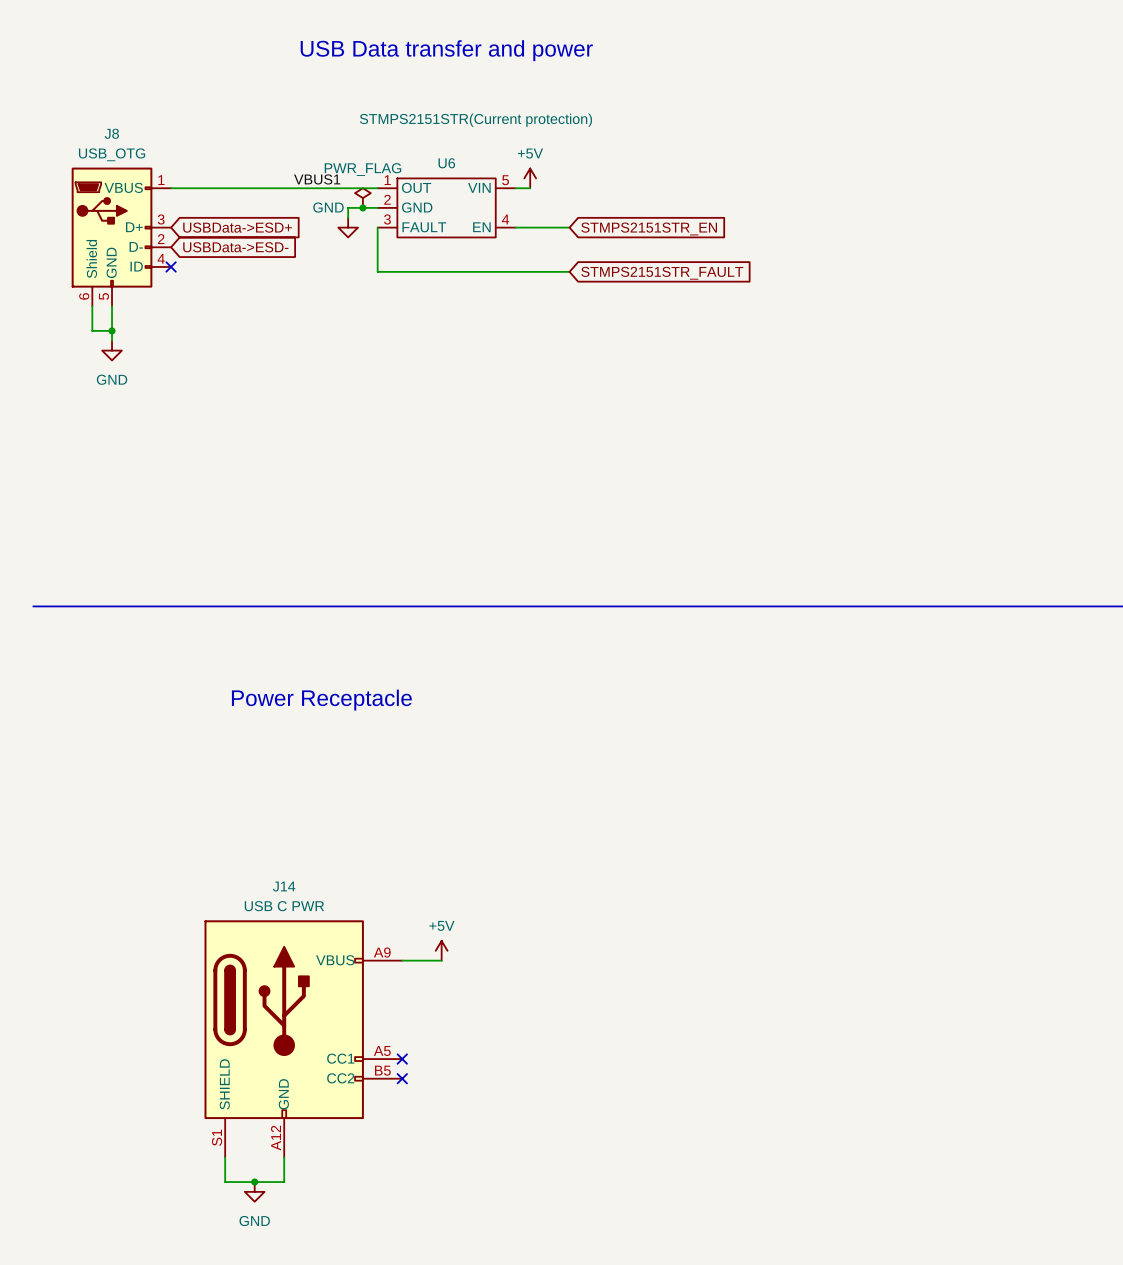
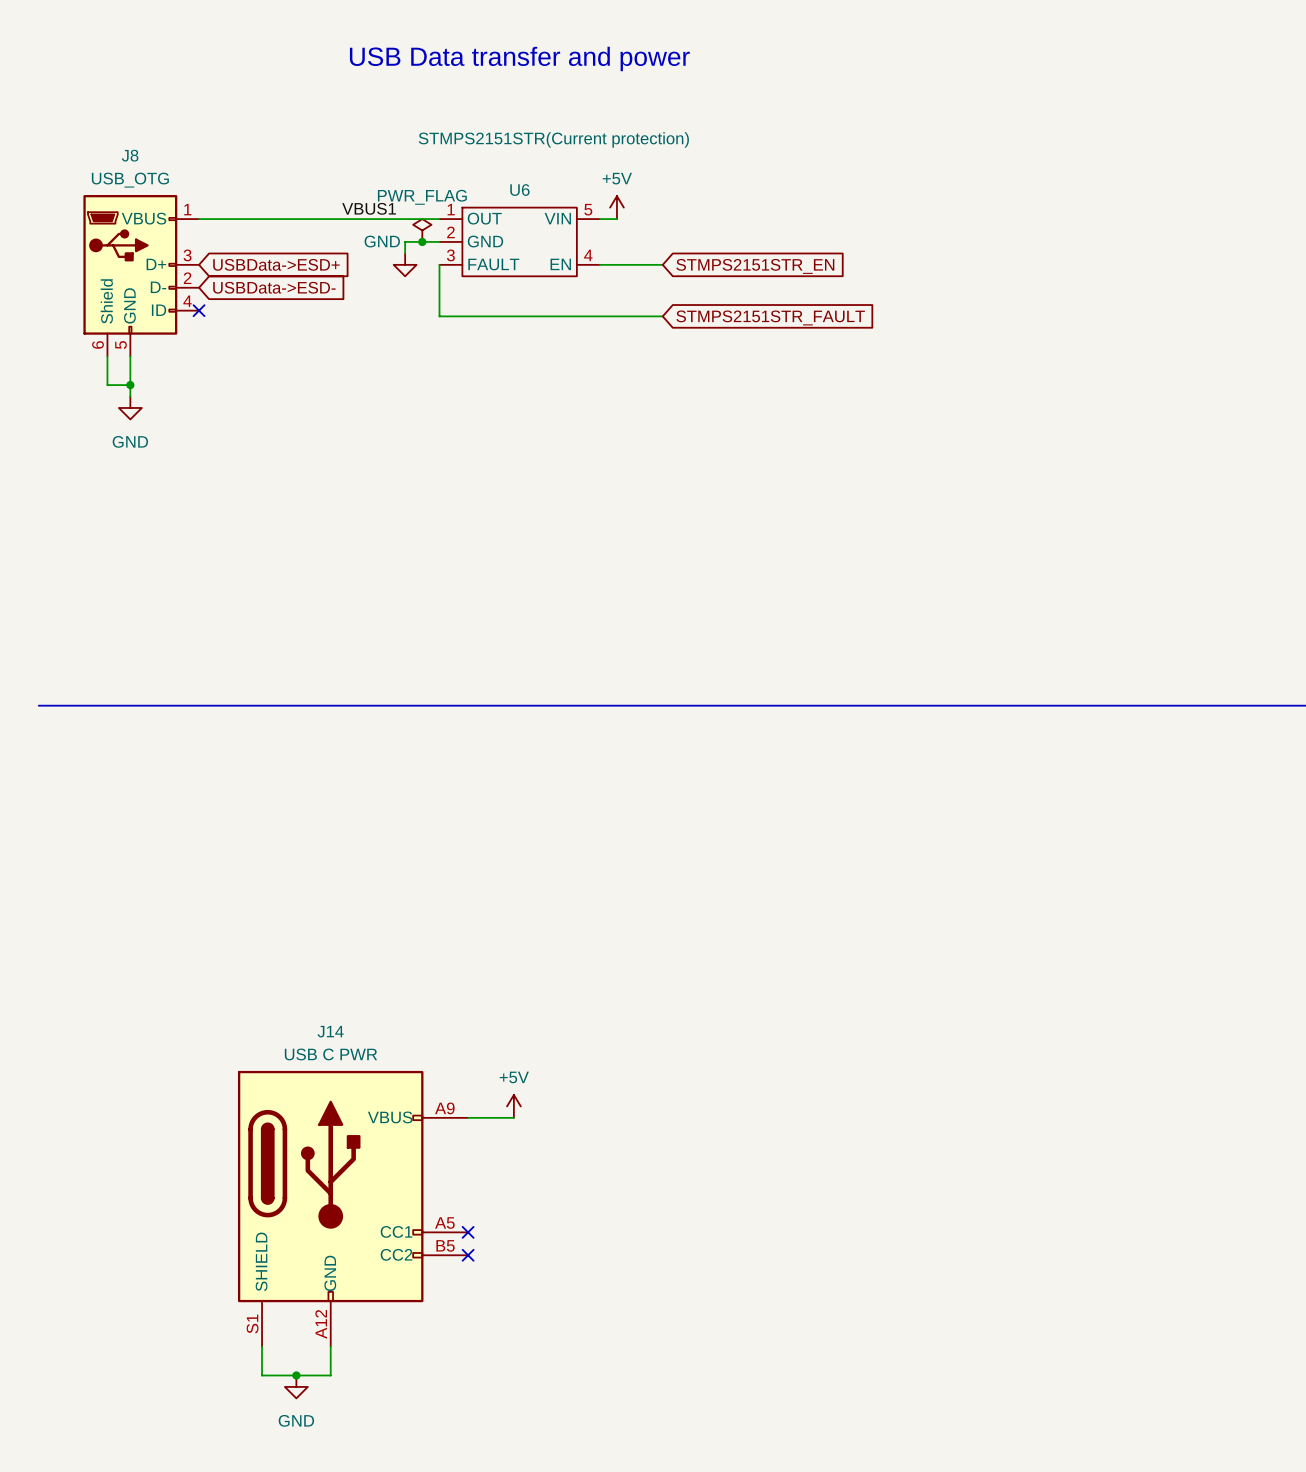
text: Power Receptacle (321, 700) -> none

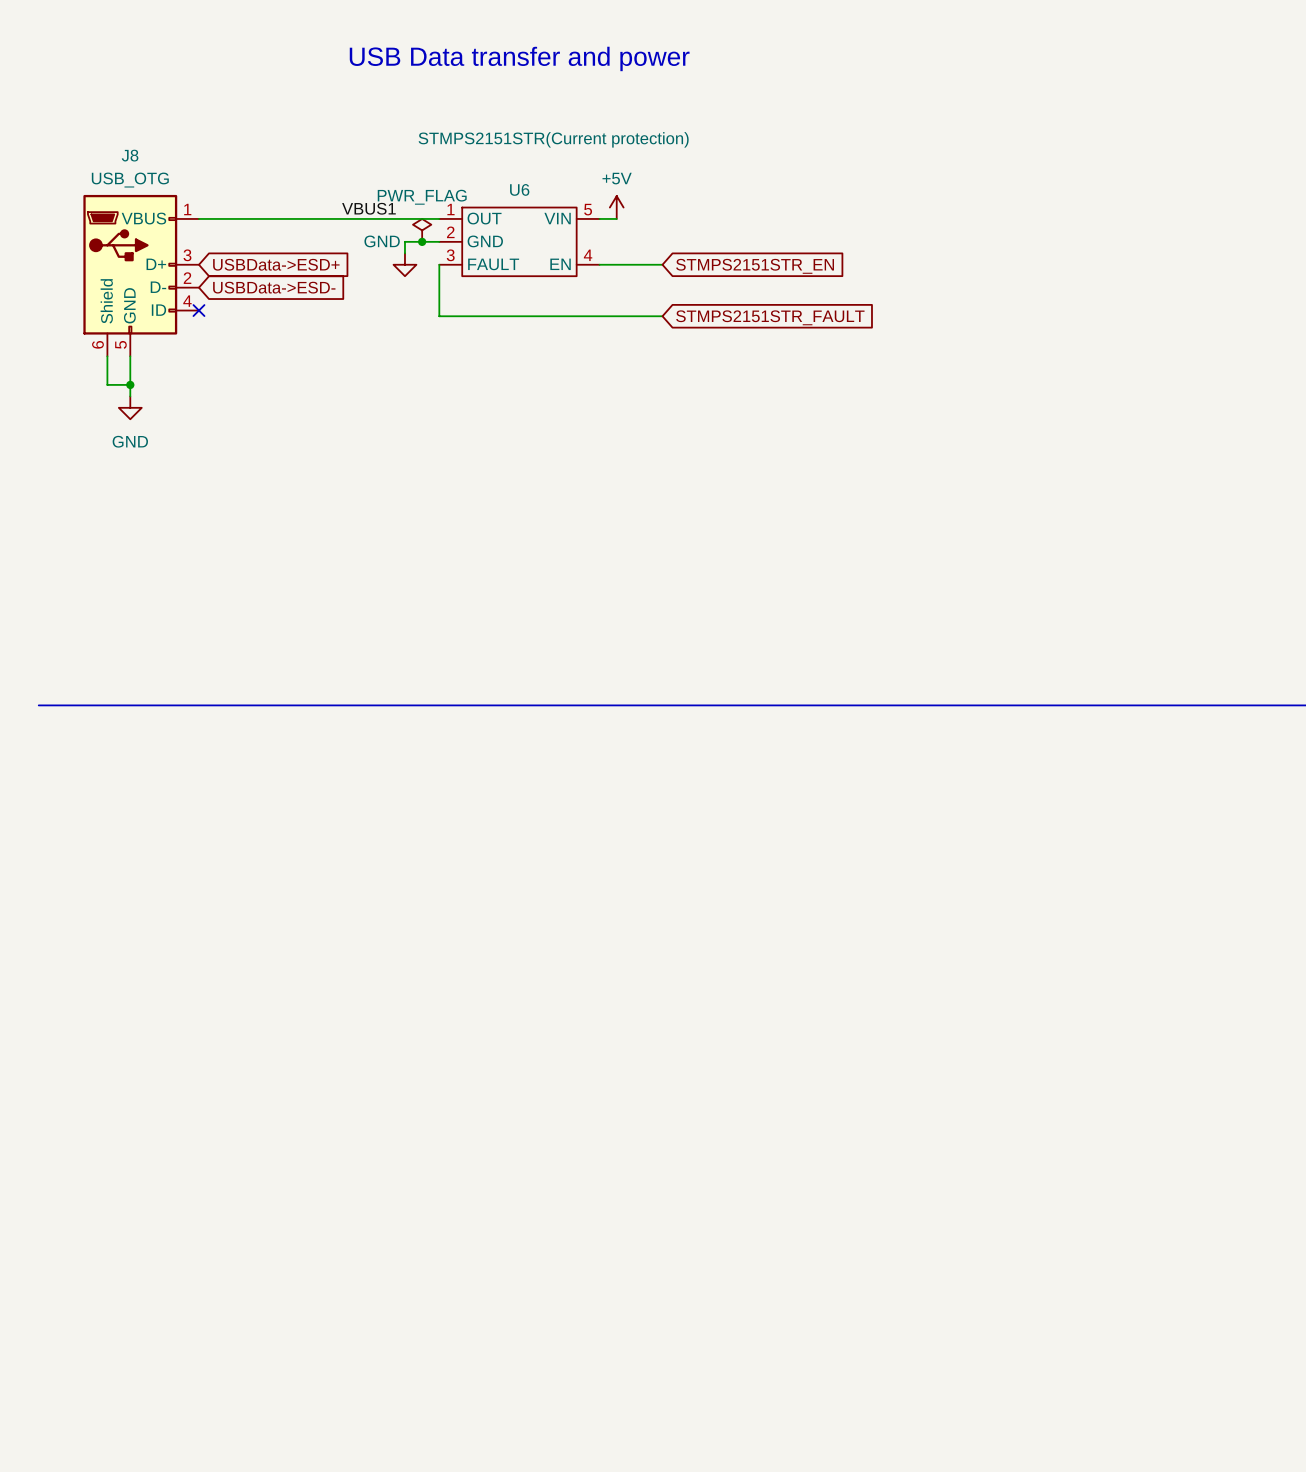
power symbol: +5V (513, 1106) -> none
wire: (468, 1117) (513, 1117) -> none
J14: USB C PWR (353, 1208) -> none
no-connect mark: (468, 1232) -> none
no-connect mark: (468, 1255) -> none
wire: (262, 1346) (262, 1375) (330, 1375) (330, 1346) -> none
junction: (296, 1375) -> none
power symbol: GND (296, 1386) -> none

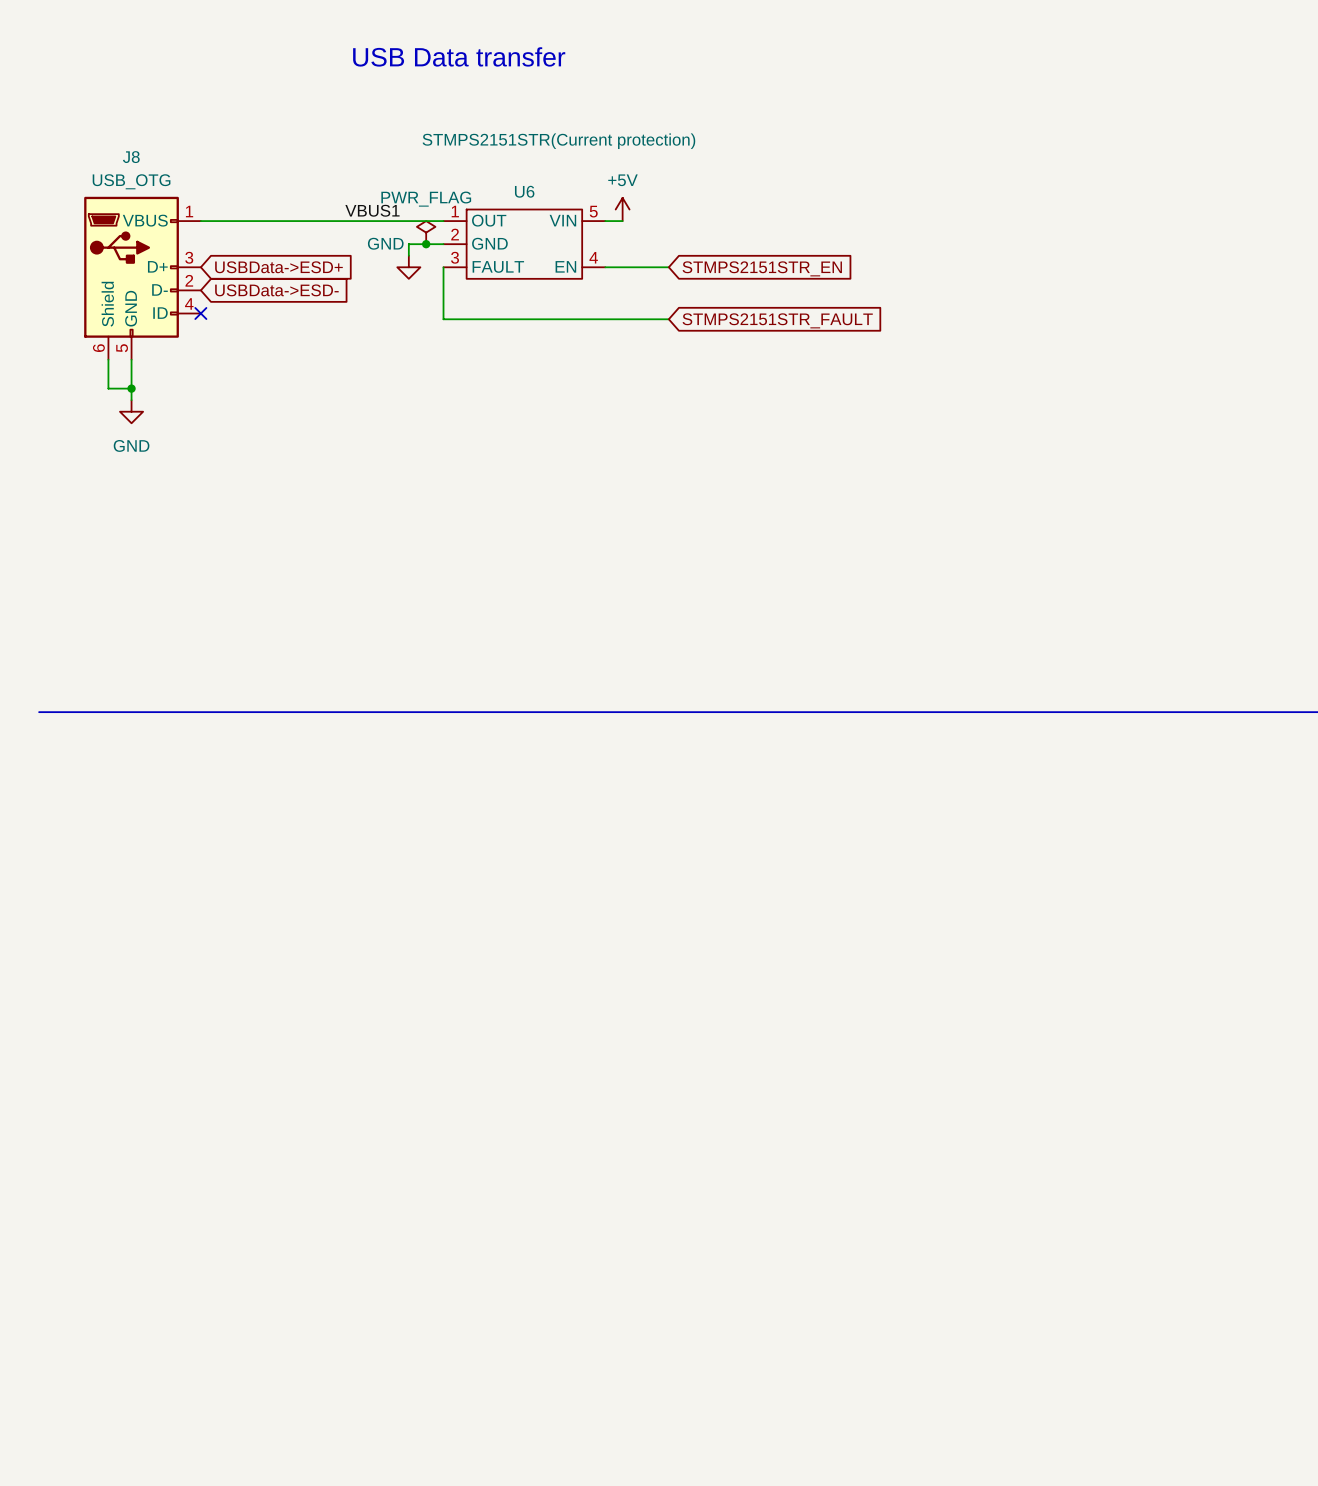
text: USB Data transfer and power (519, 58) -> USB Data transfer (459, 56)

